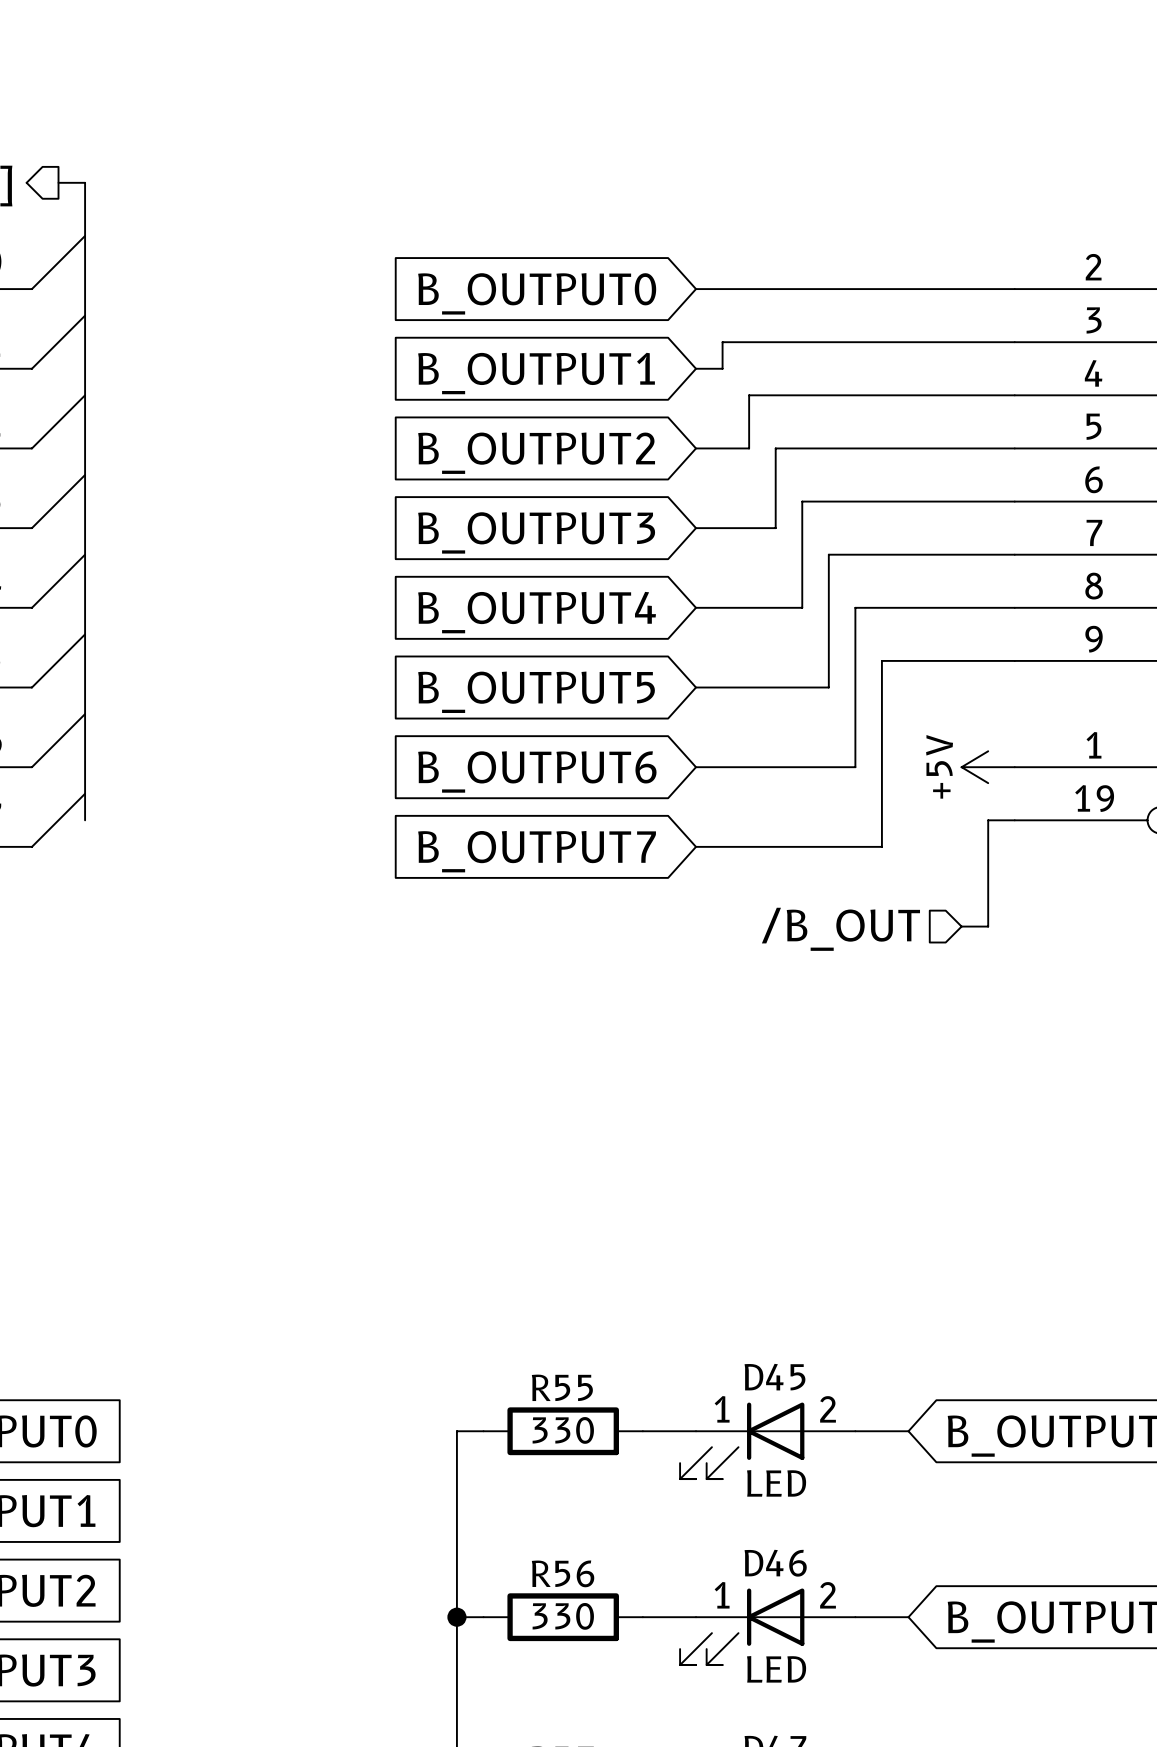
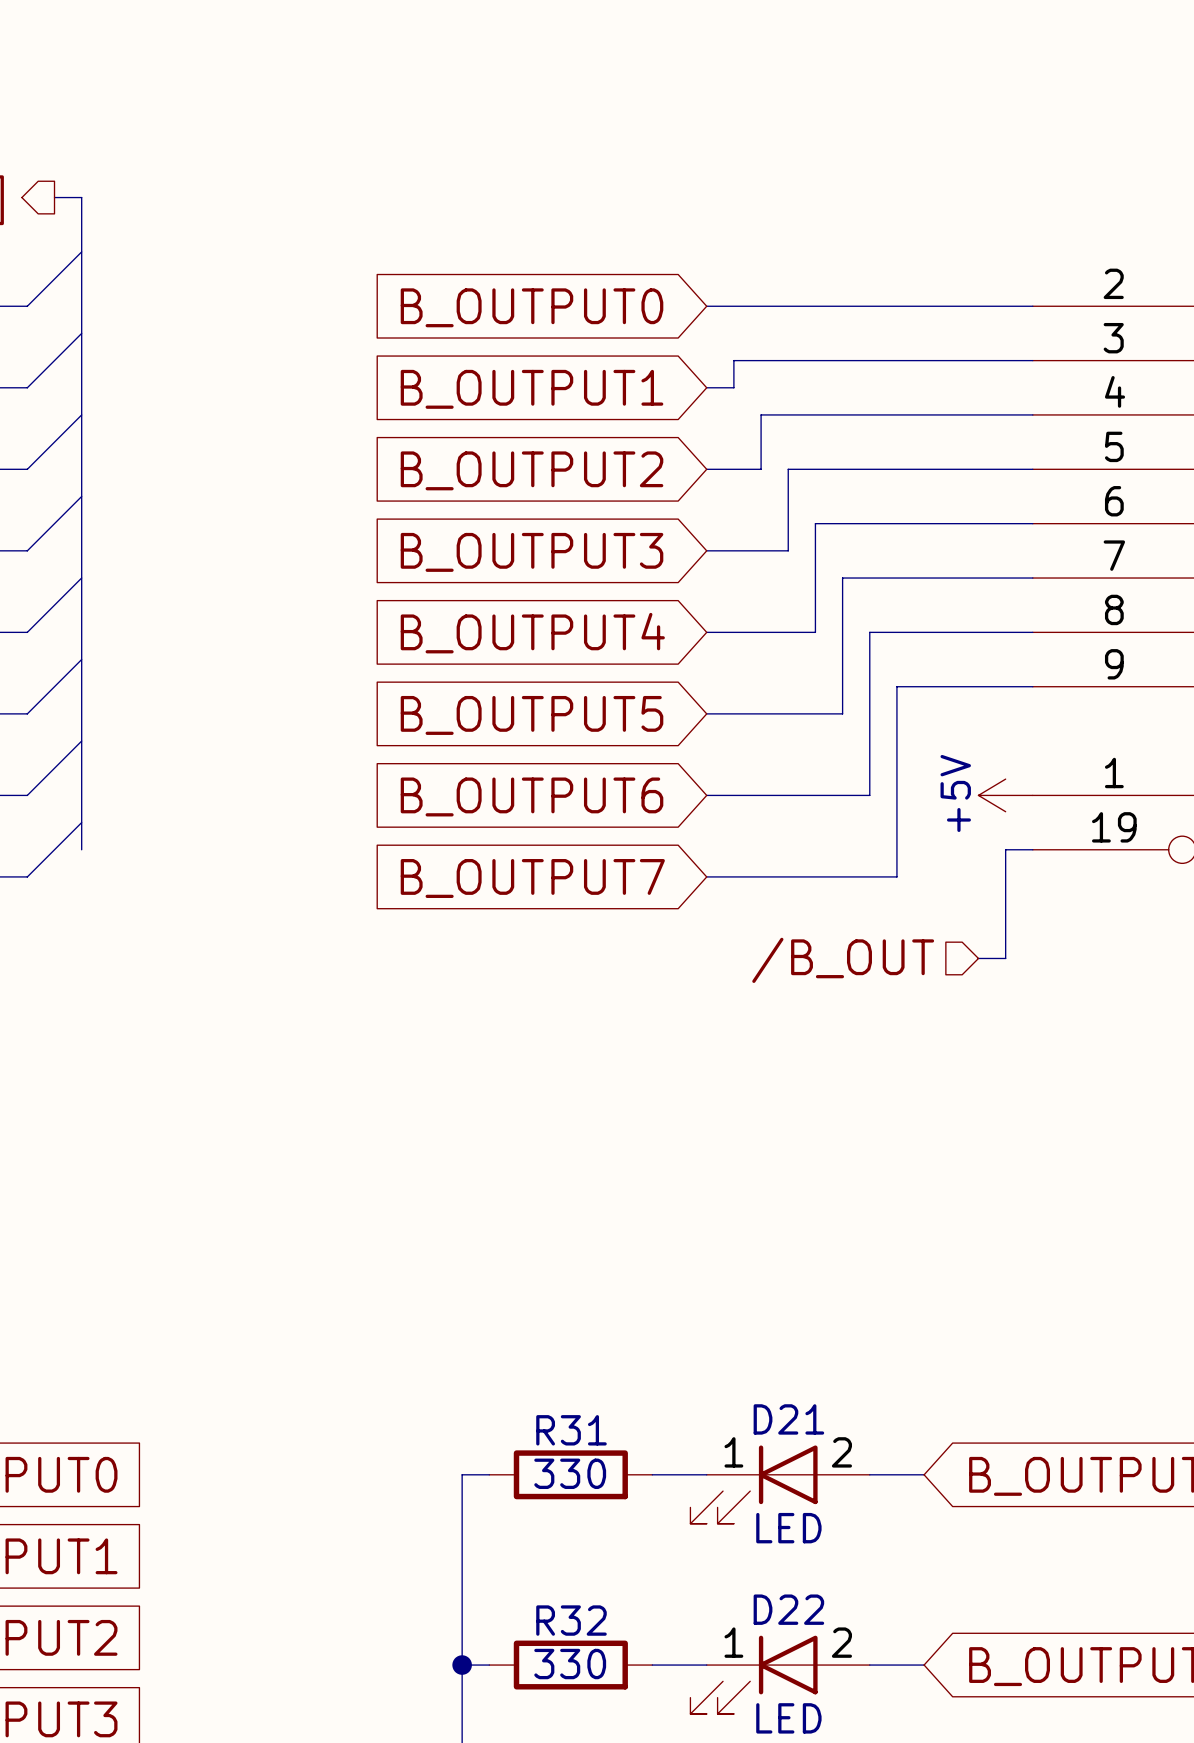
D45 name: D45 (774, 1377) -> D21 (788, 1419)
R55 name: R55 (562, 1387) -> R31 (571, 1430)
D46 name: D46 (775, 1563) -> D22 (788, 1609)
R56 name: R56 (563, 1573) -> R32 (571, 1620)

